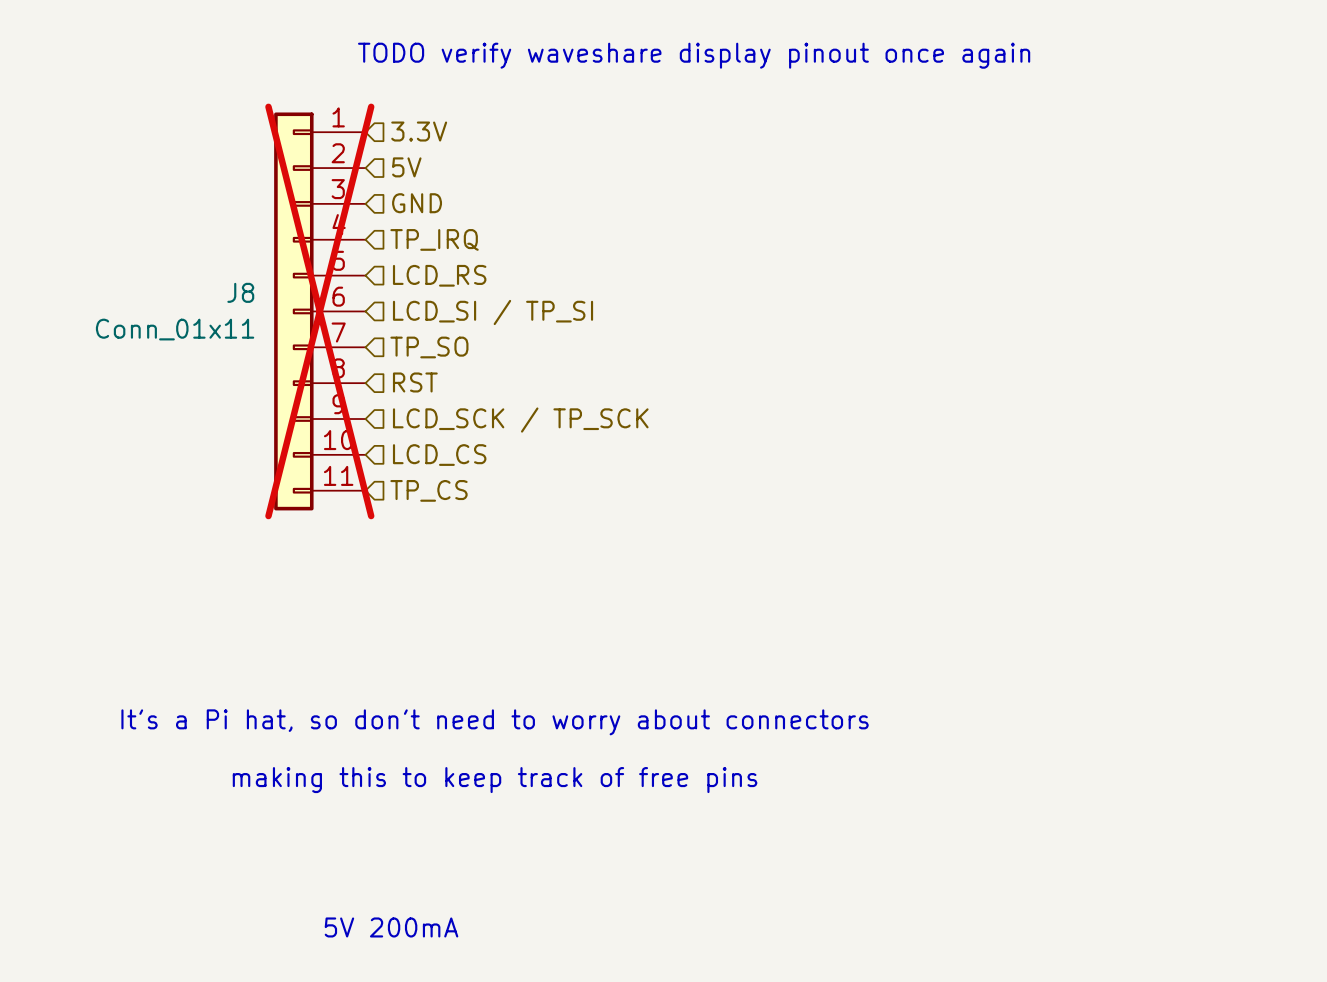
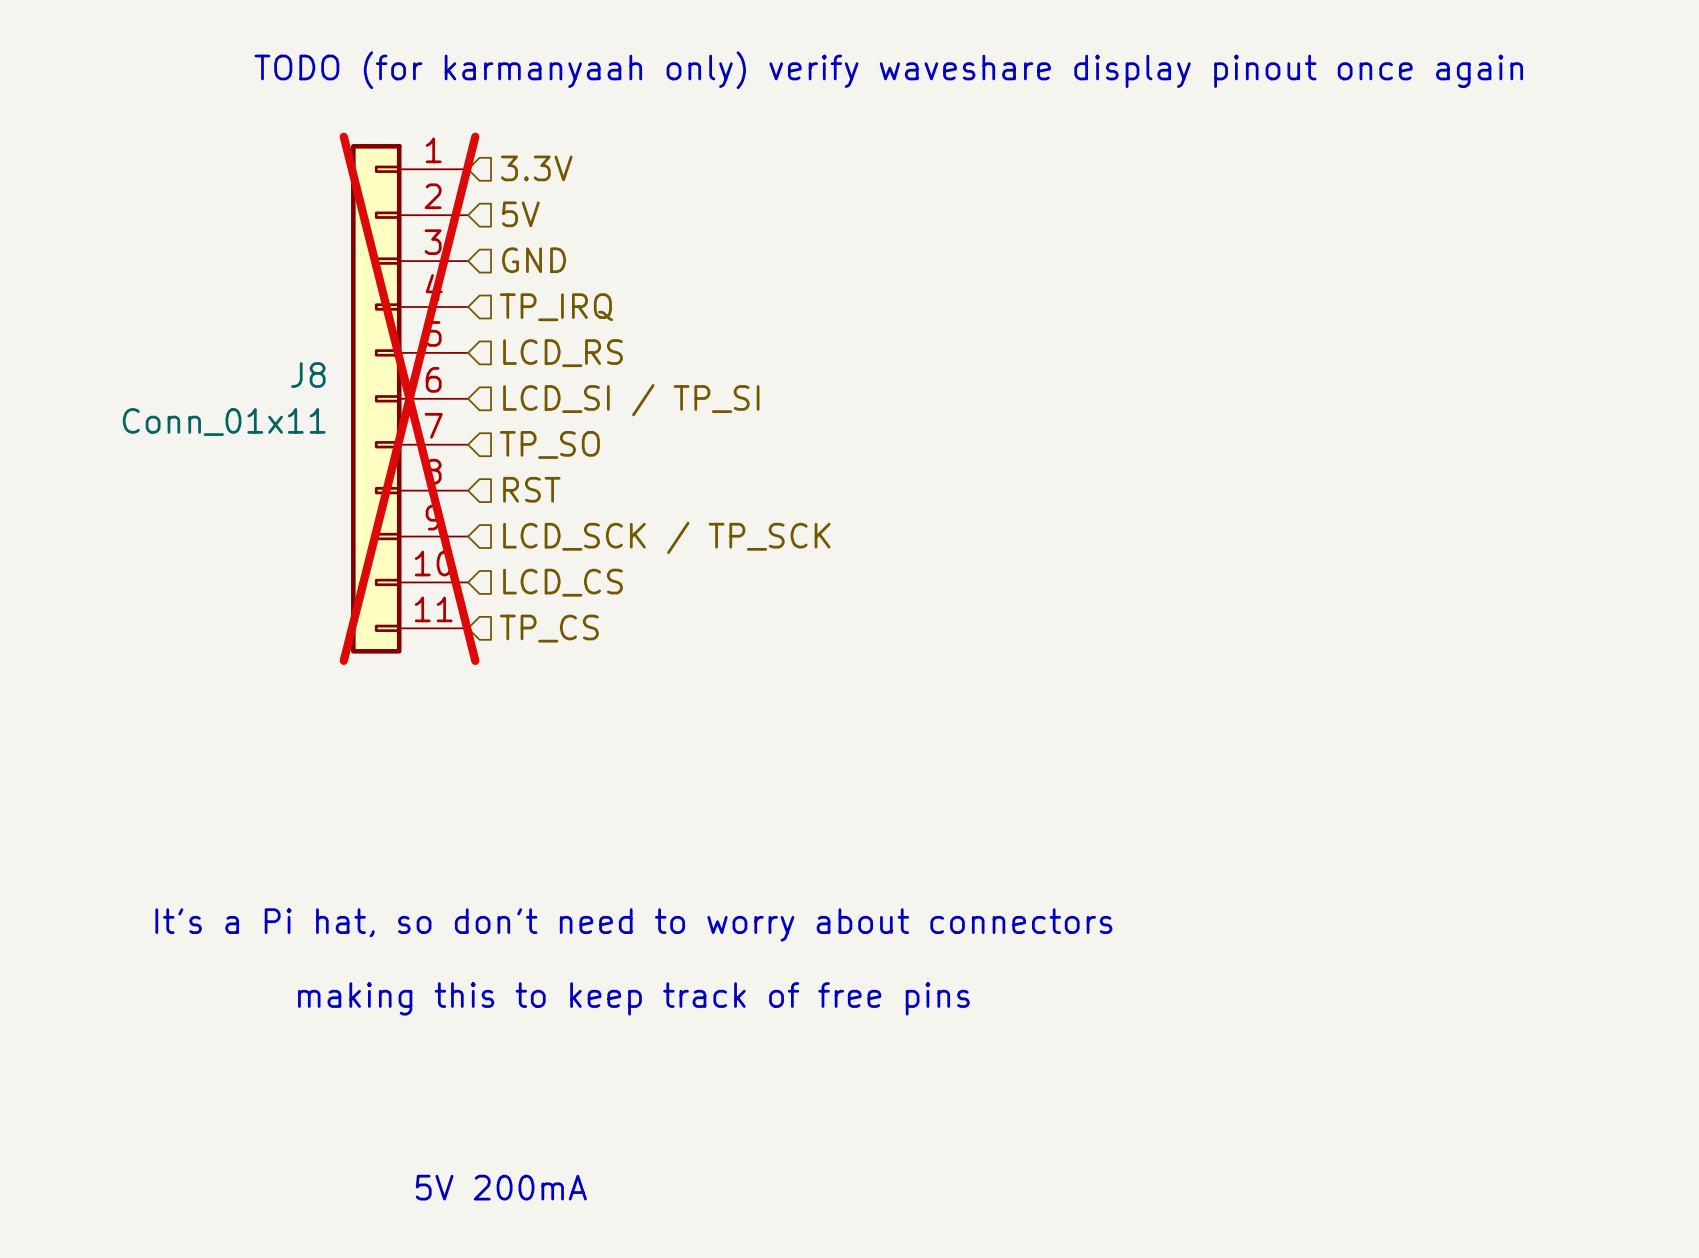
text: TODO verify waveshare display pinout once again (694, 55) -> TODO (for karmanyaah only) verify waveshare display pinout once again (888, 70)

